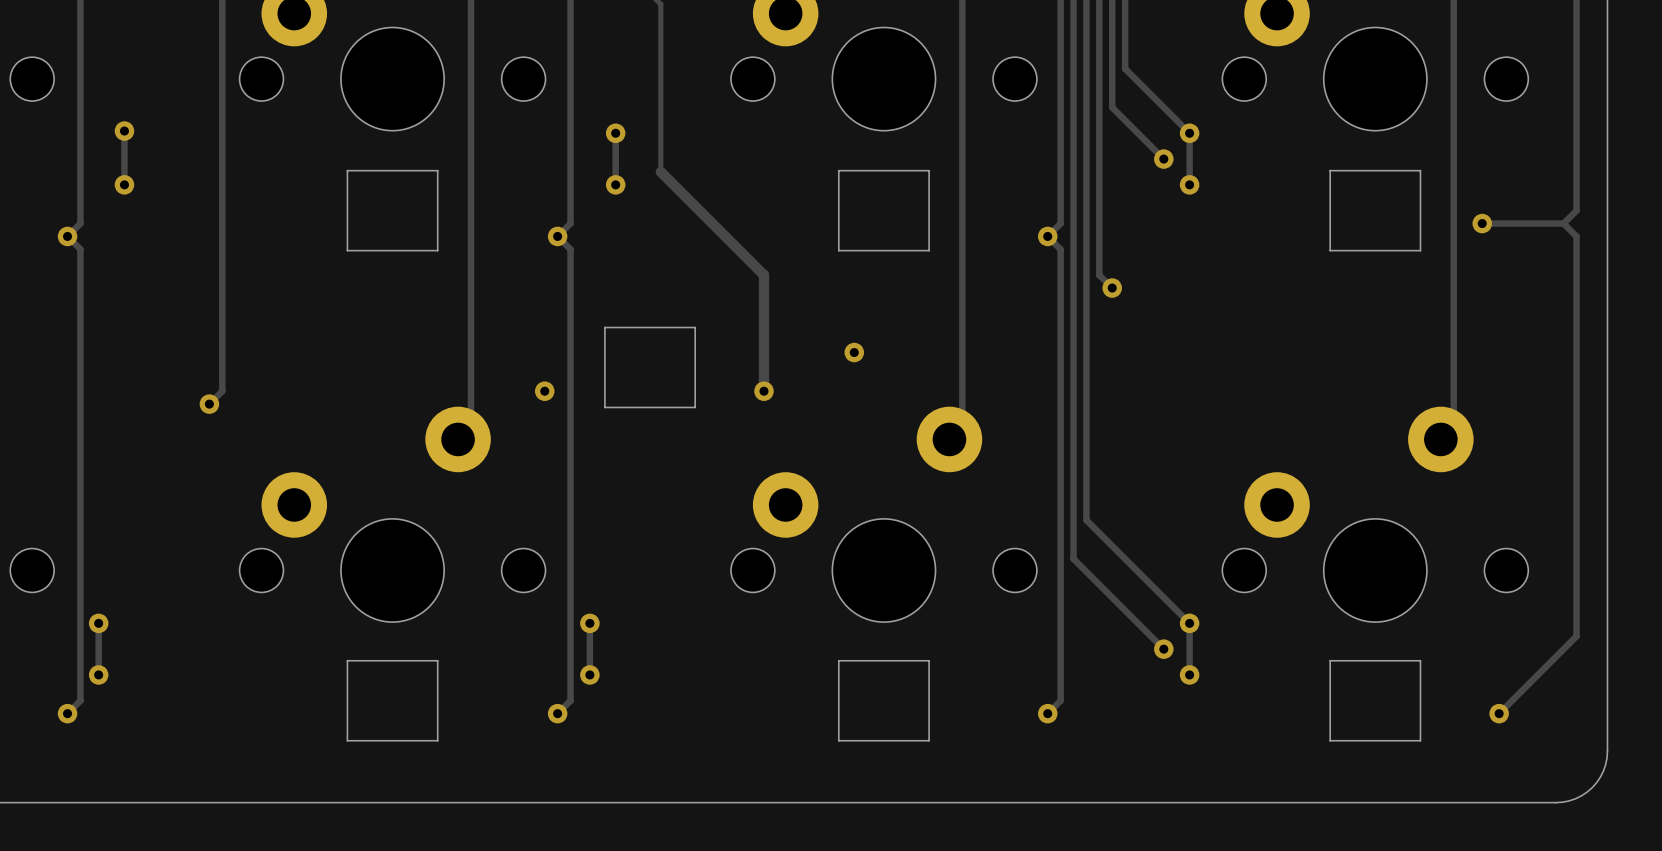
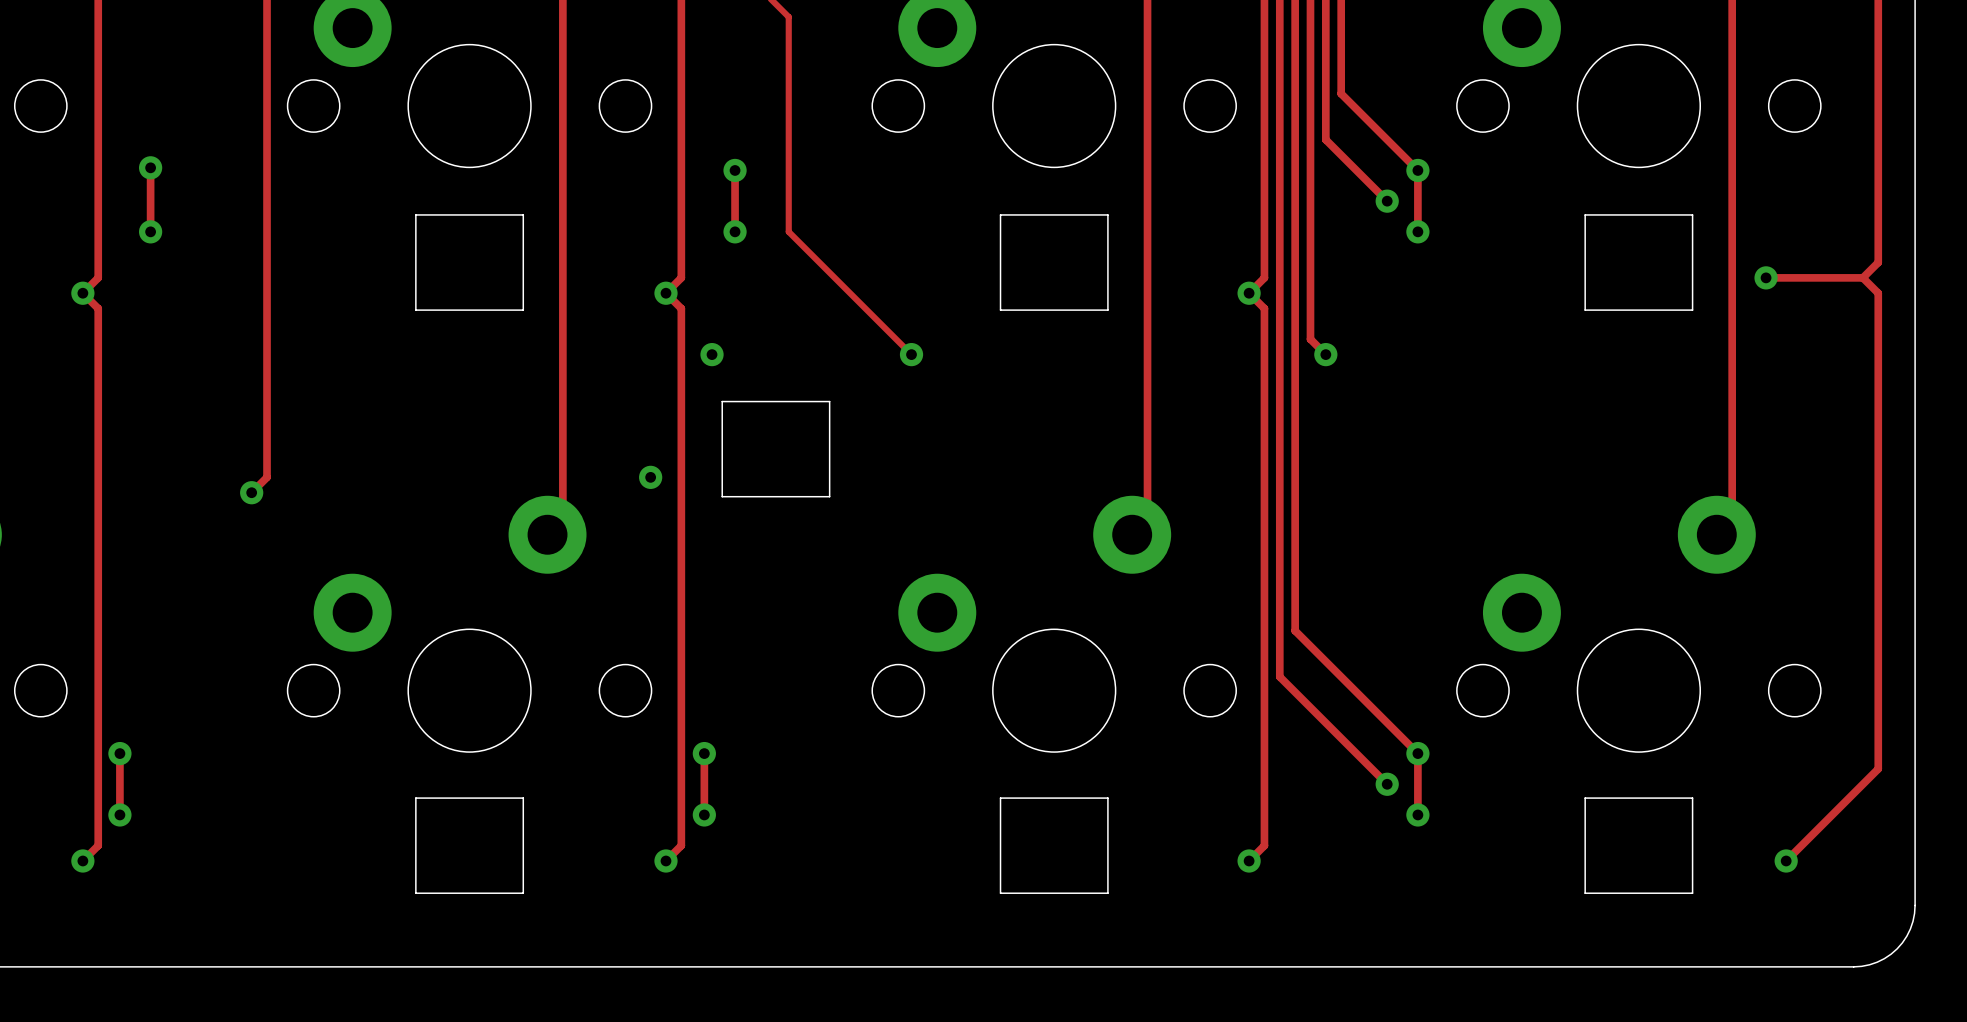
track: (660, 171) (763, 275) (763, 391) -> (788, 216) (788, 231) (911, 354)
via: none -> (712, 354)
via: none -> (911, 354)
via: (854, 352) -> none
via: (763, 391) -> none

